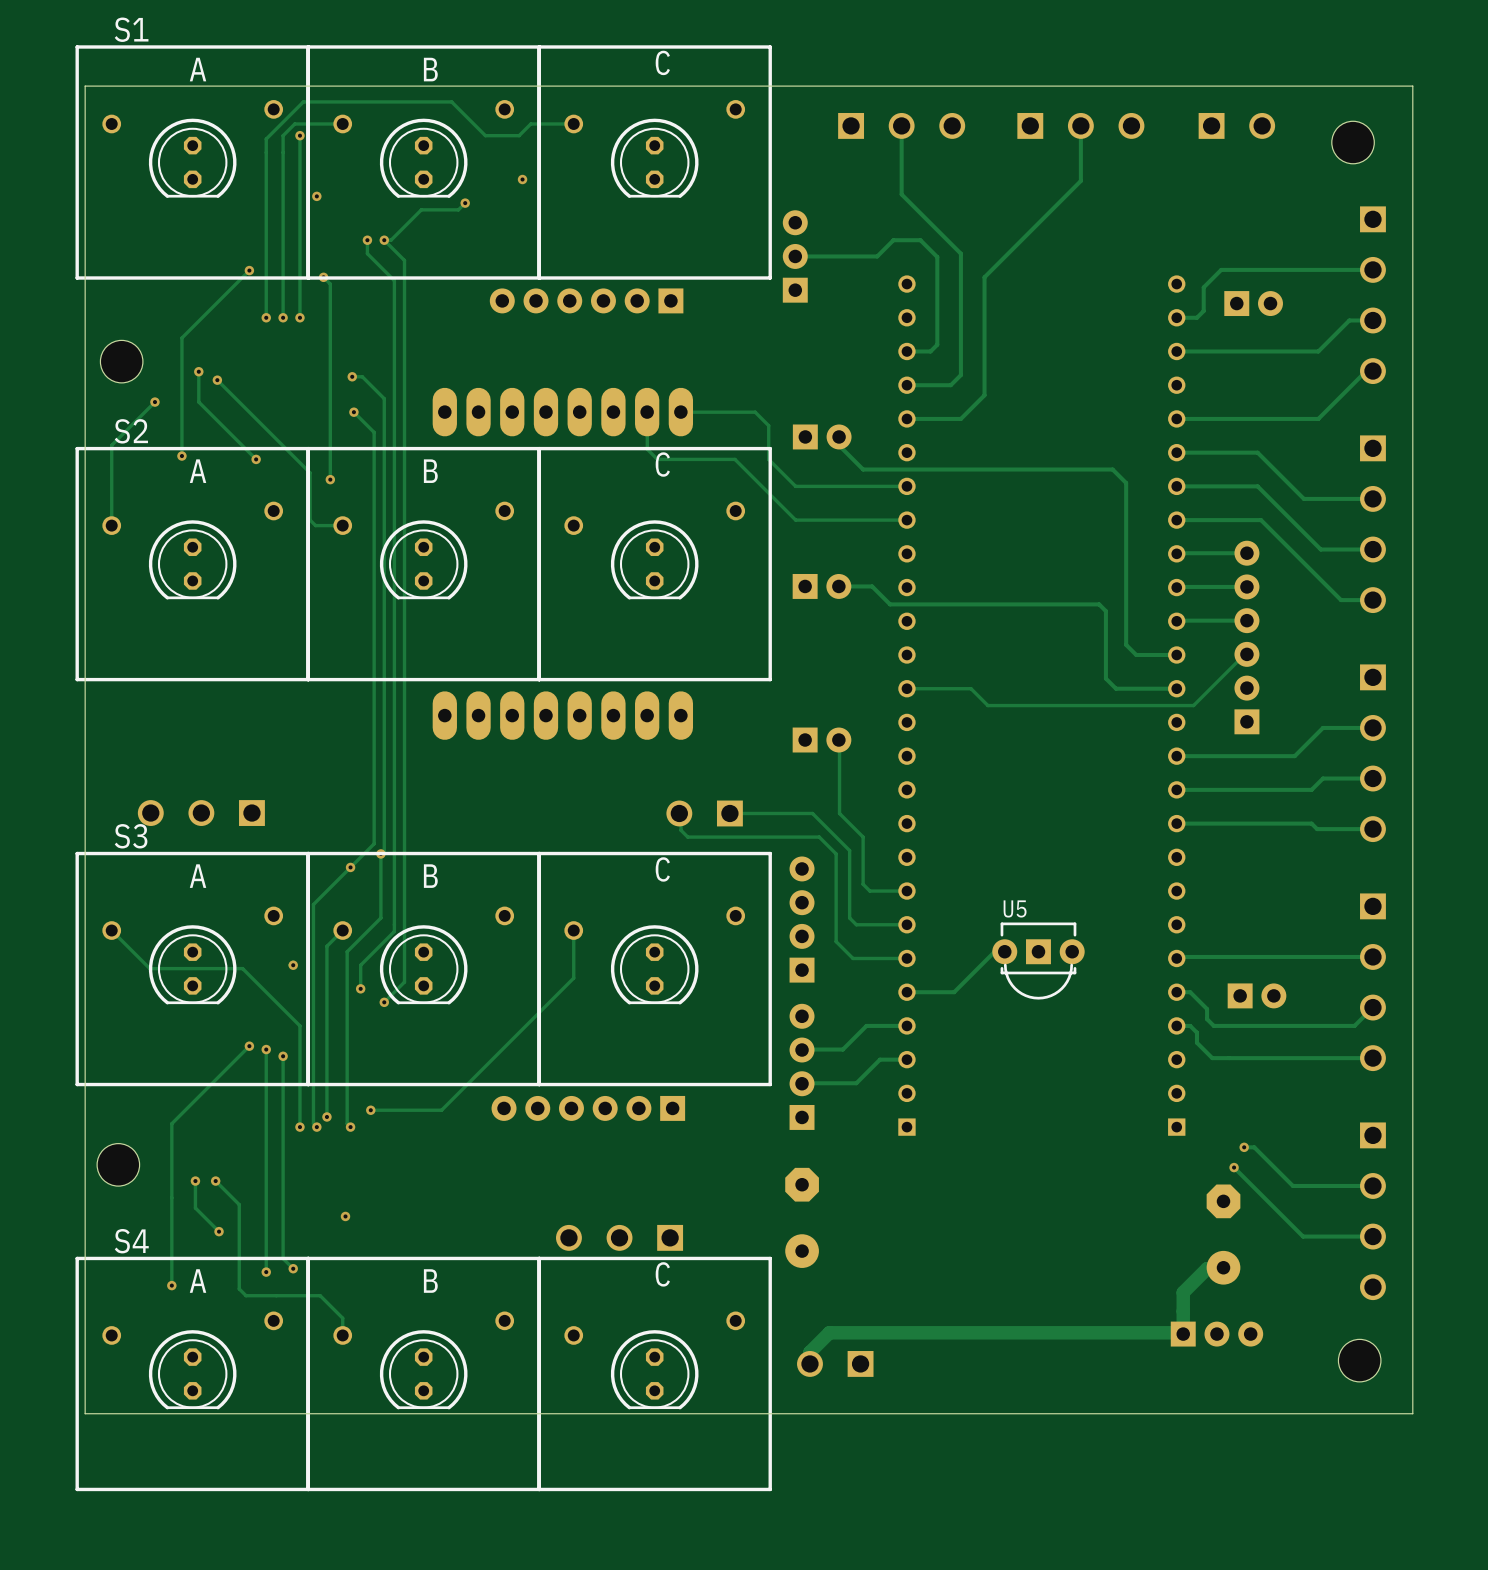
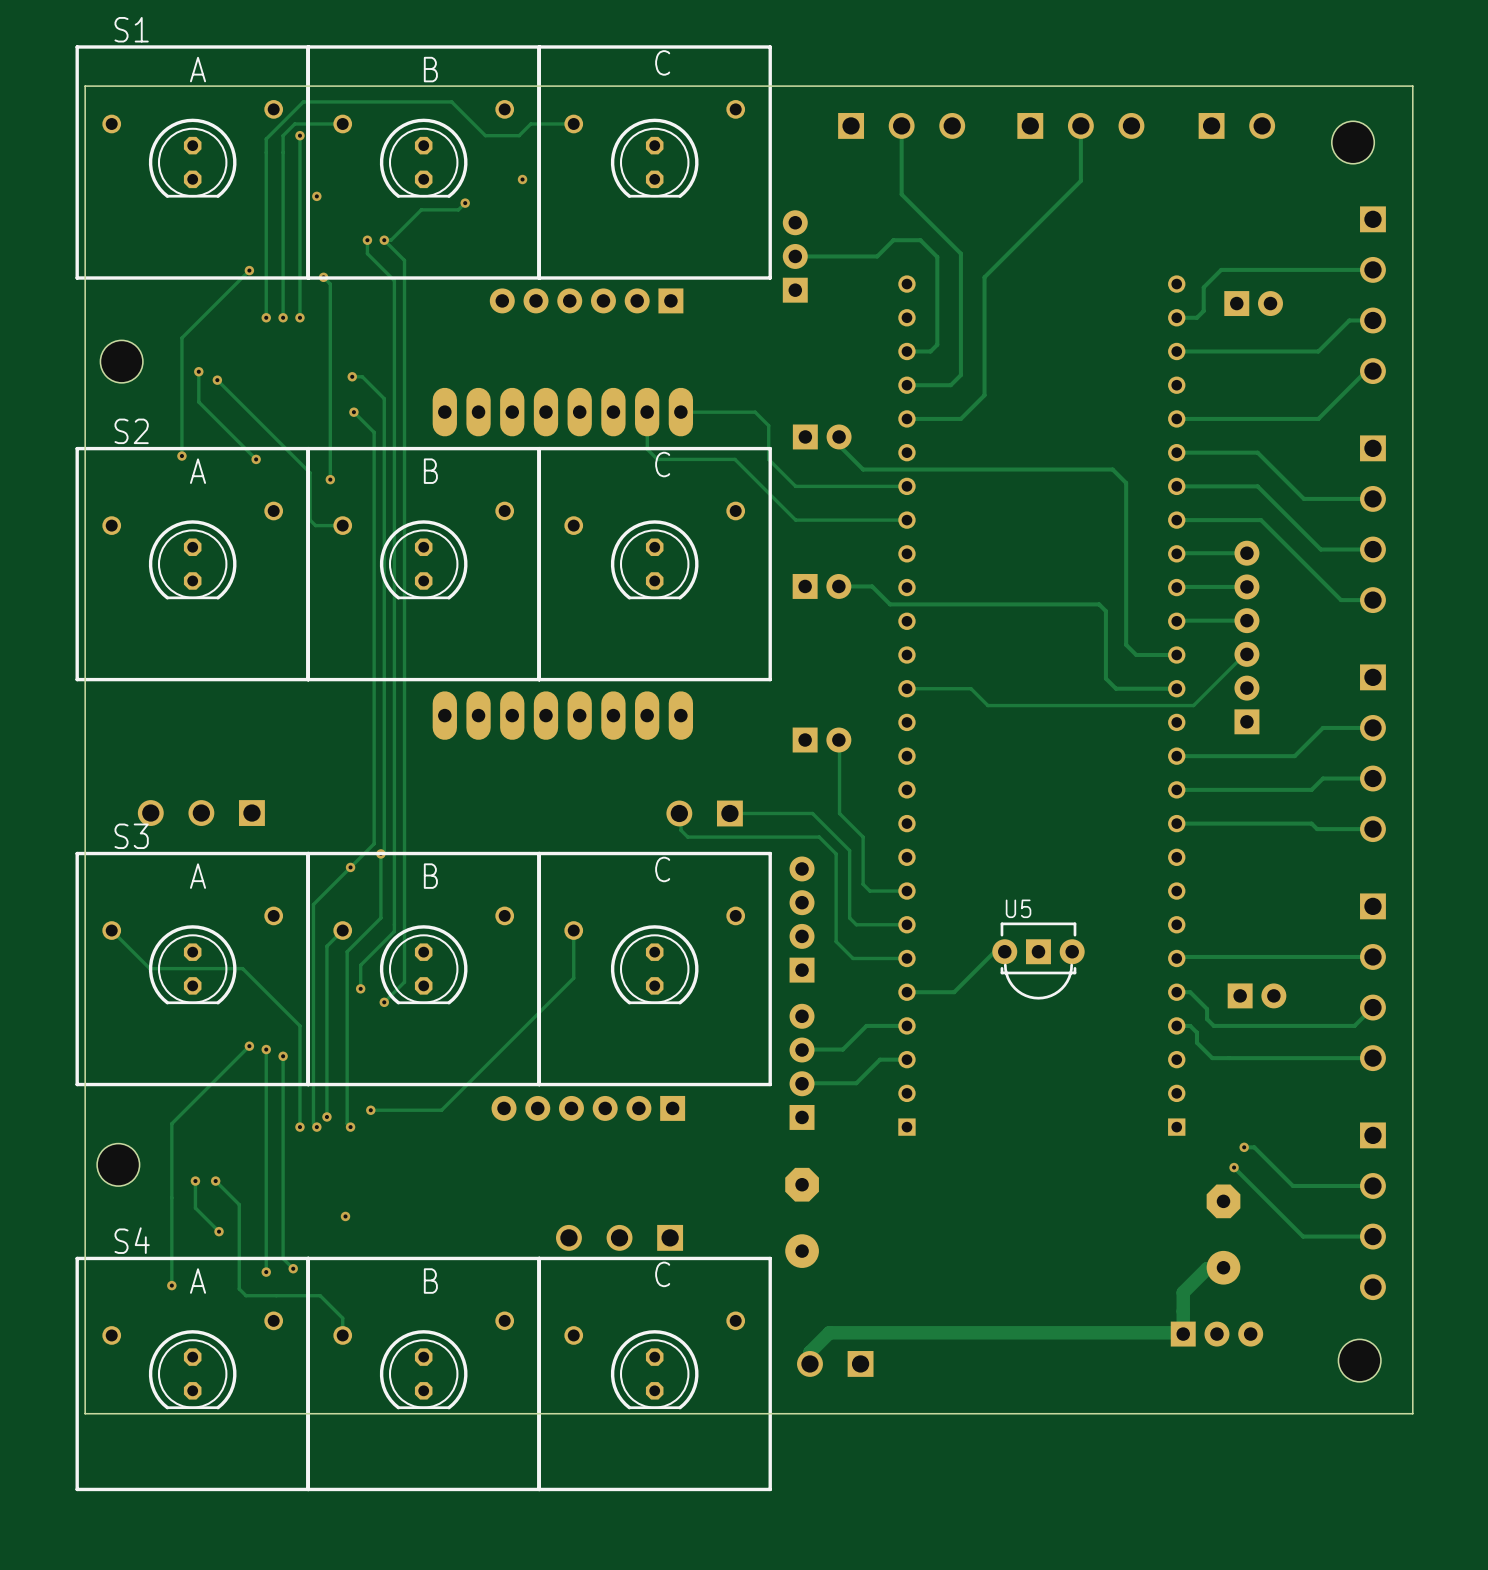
track: (154, 402) (111, 445) (111, 525) -> none
via: (154, 402) -> none
via: (293, 965) -> none

